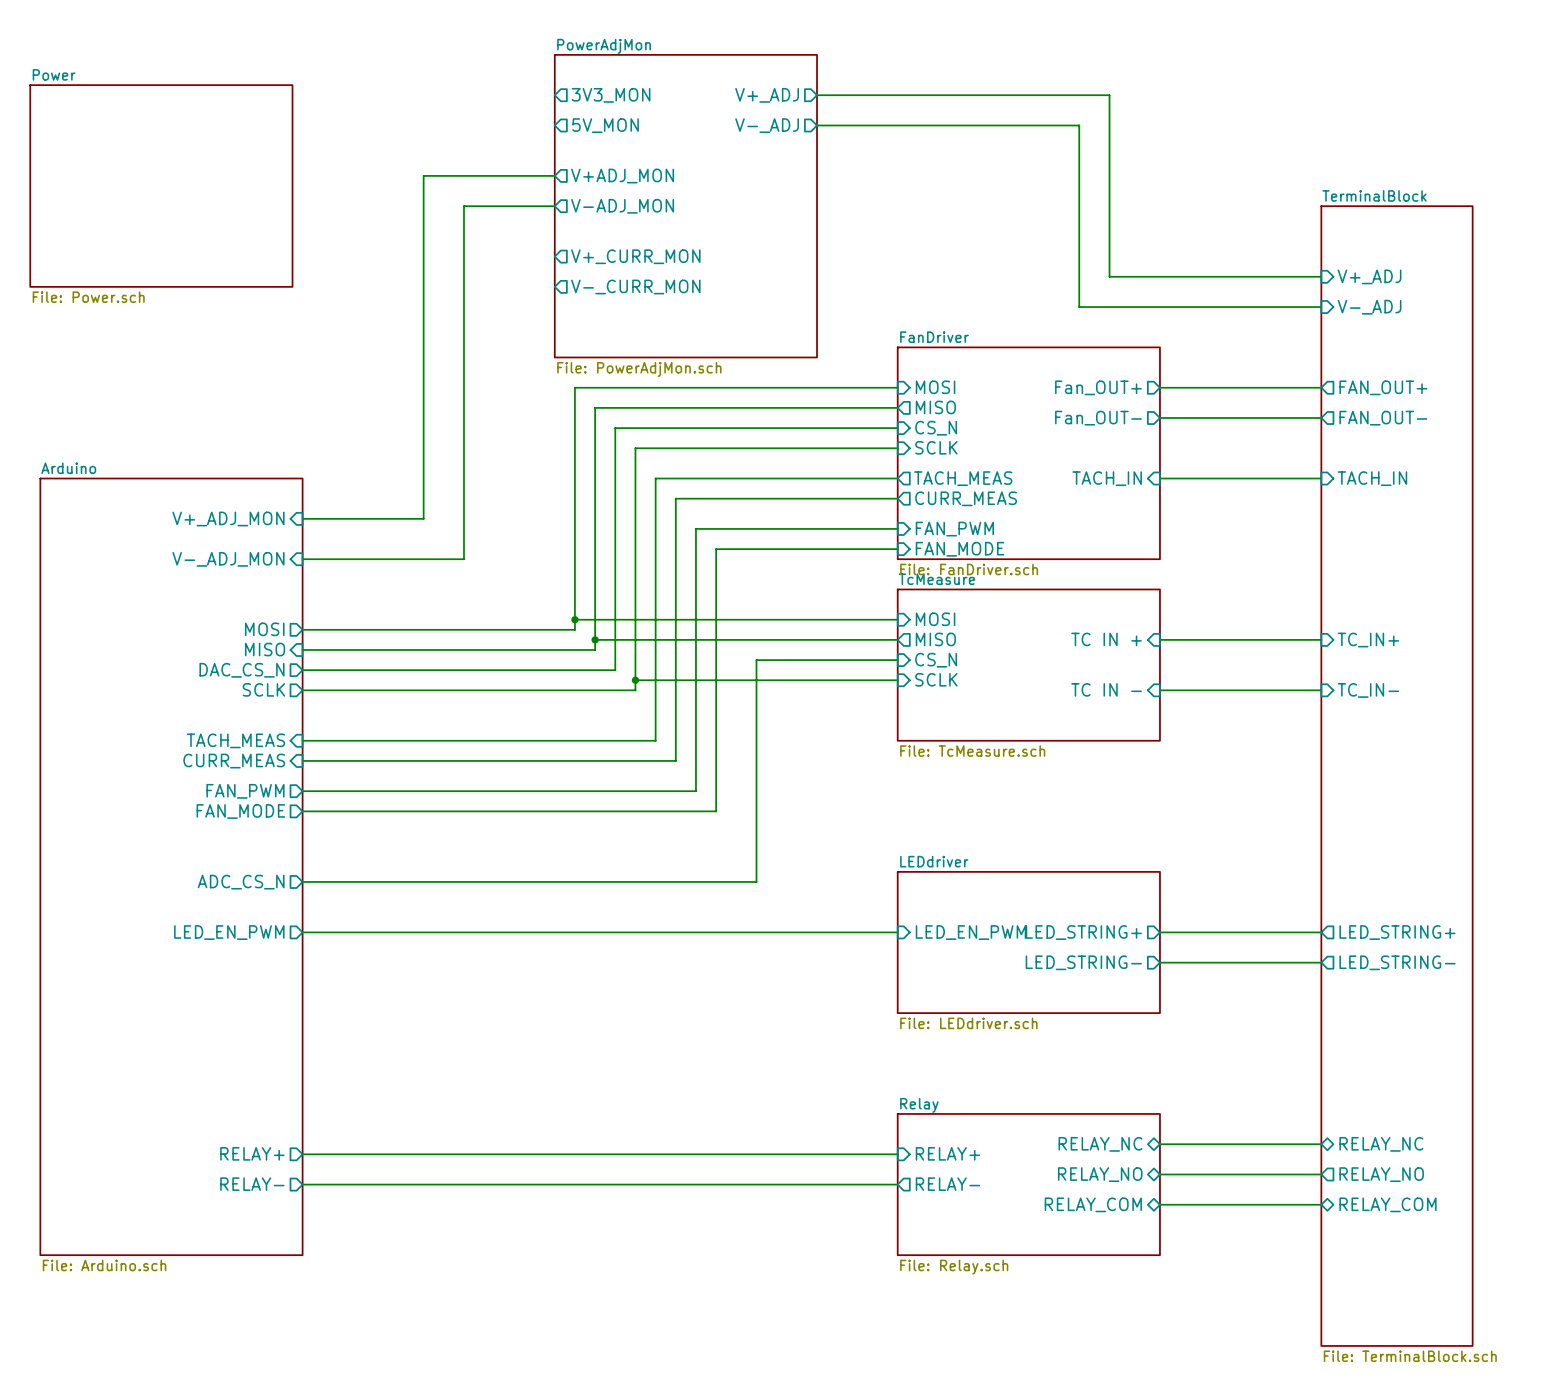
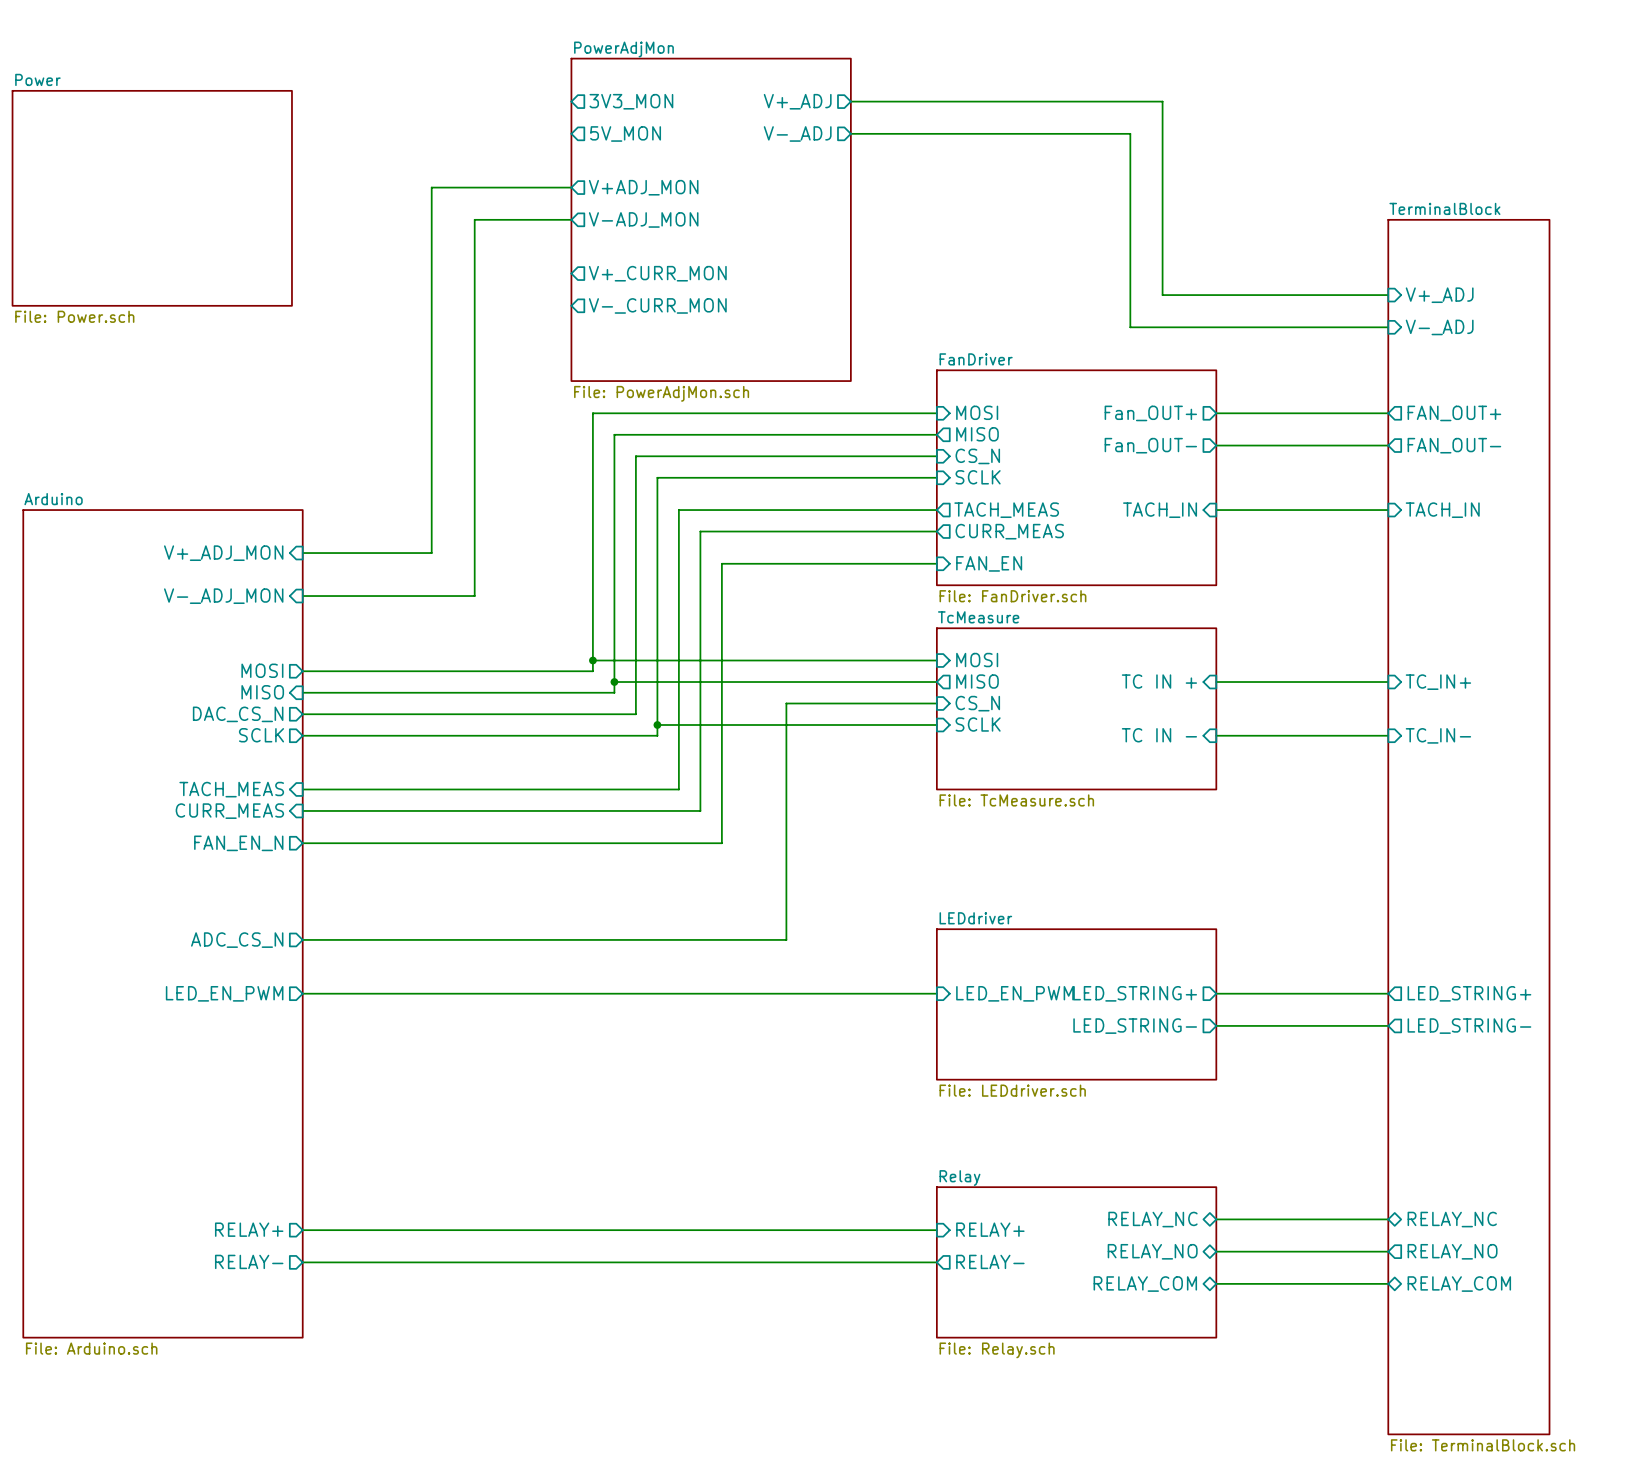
sheet FanDriver shape: [897, 347, 1160, 560] -> [936, 370, 1217, 586]
sheet pin: FAN_PWM (954, 529) -> FAN_EN (989, 563)
wire: (897, 549) (716, 549) (716, 811) (302, 811) -> none
sheet pin: FAN_MODE (960, 549) -> none
sheet pin: FAN_PWM (245, 791) -> FAN_EN_N (238, 843)
sheet pin: FAN_MODE (240, 811) -> none

